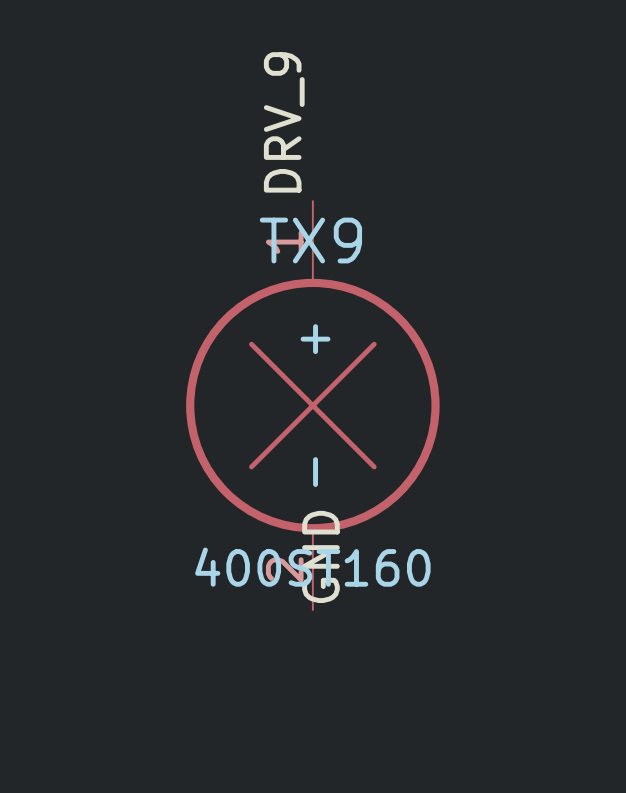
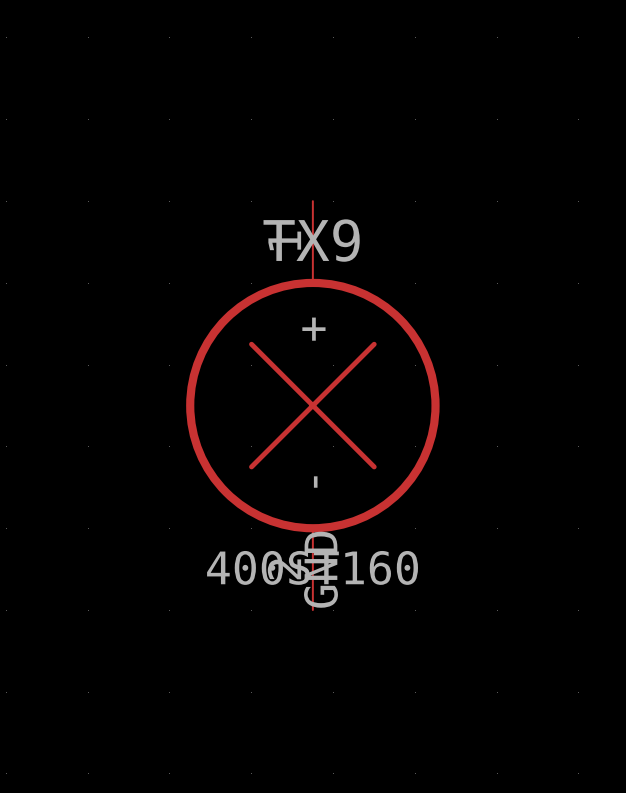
label: DRV_9 (284, 122) -> none

